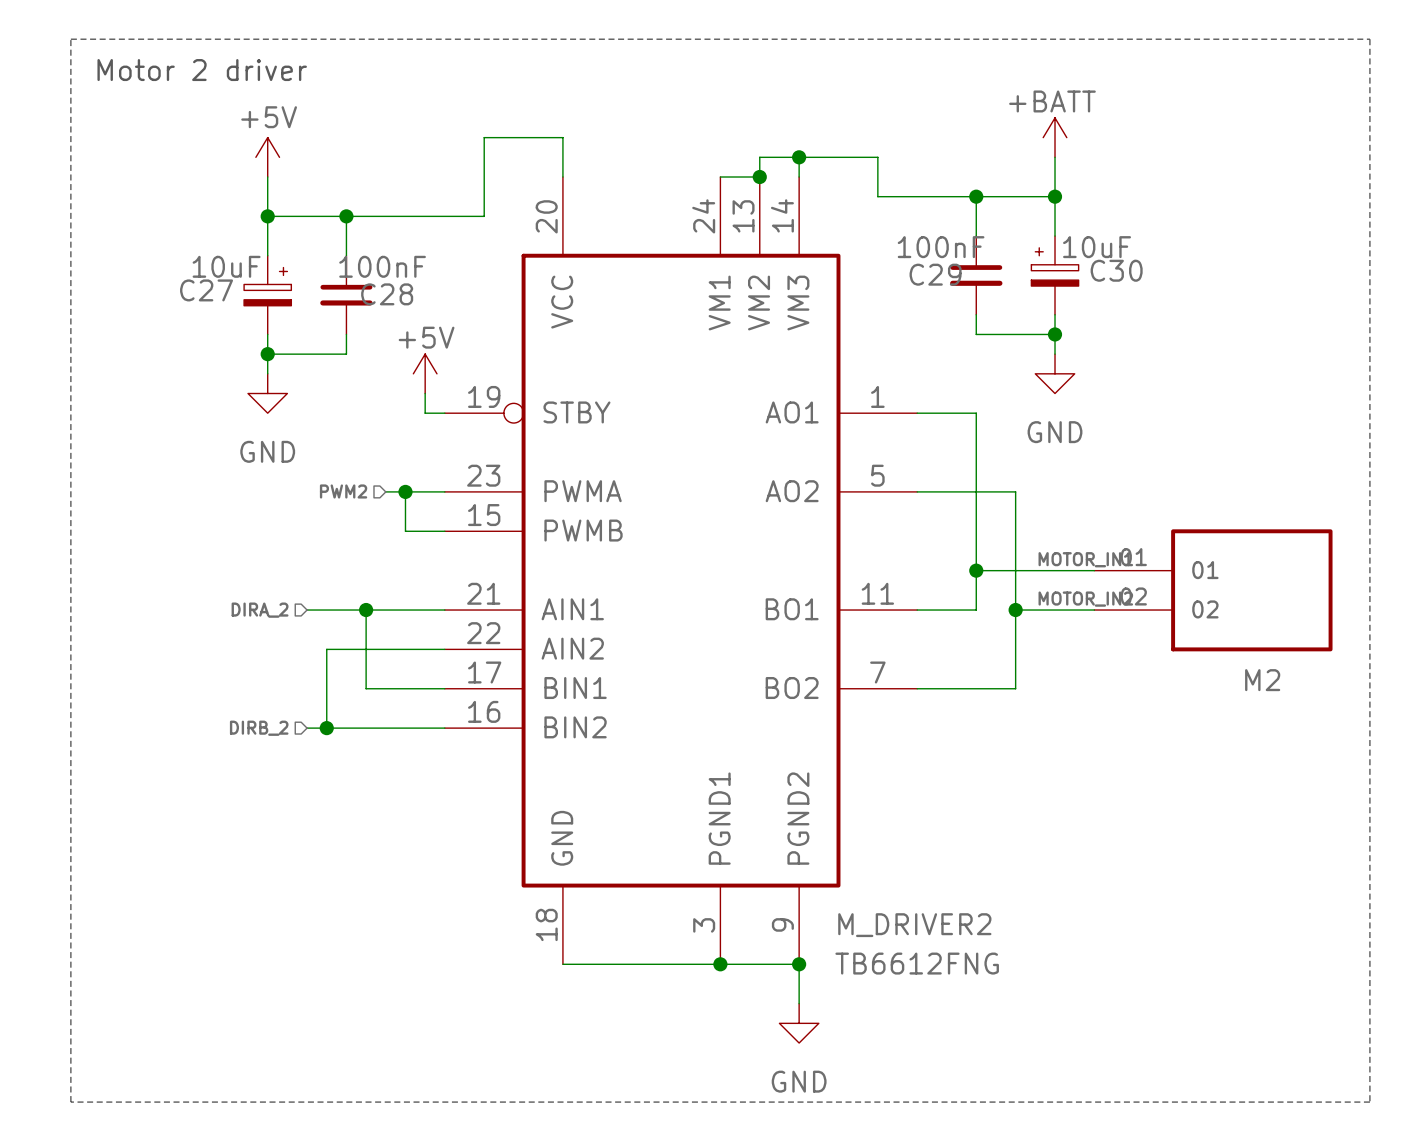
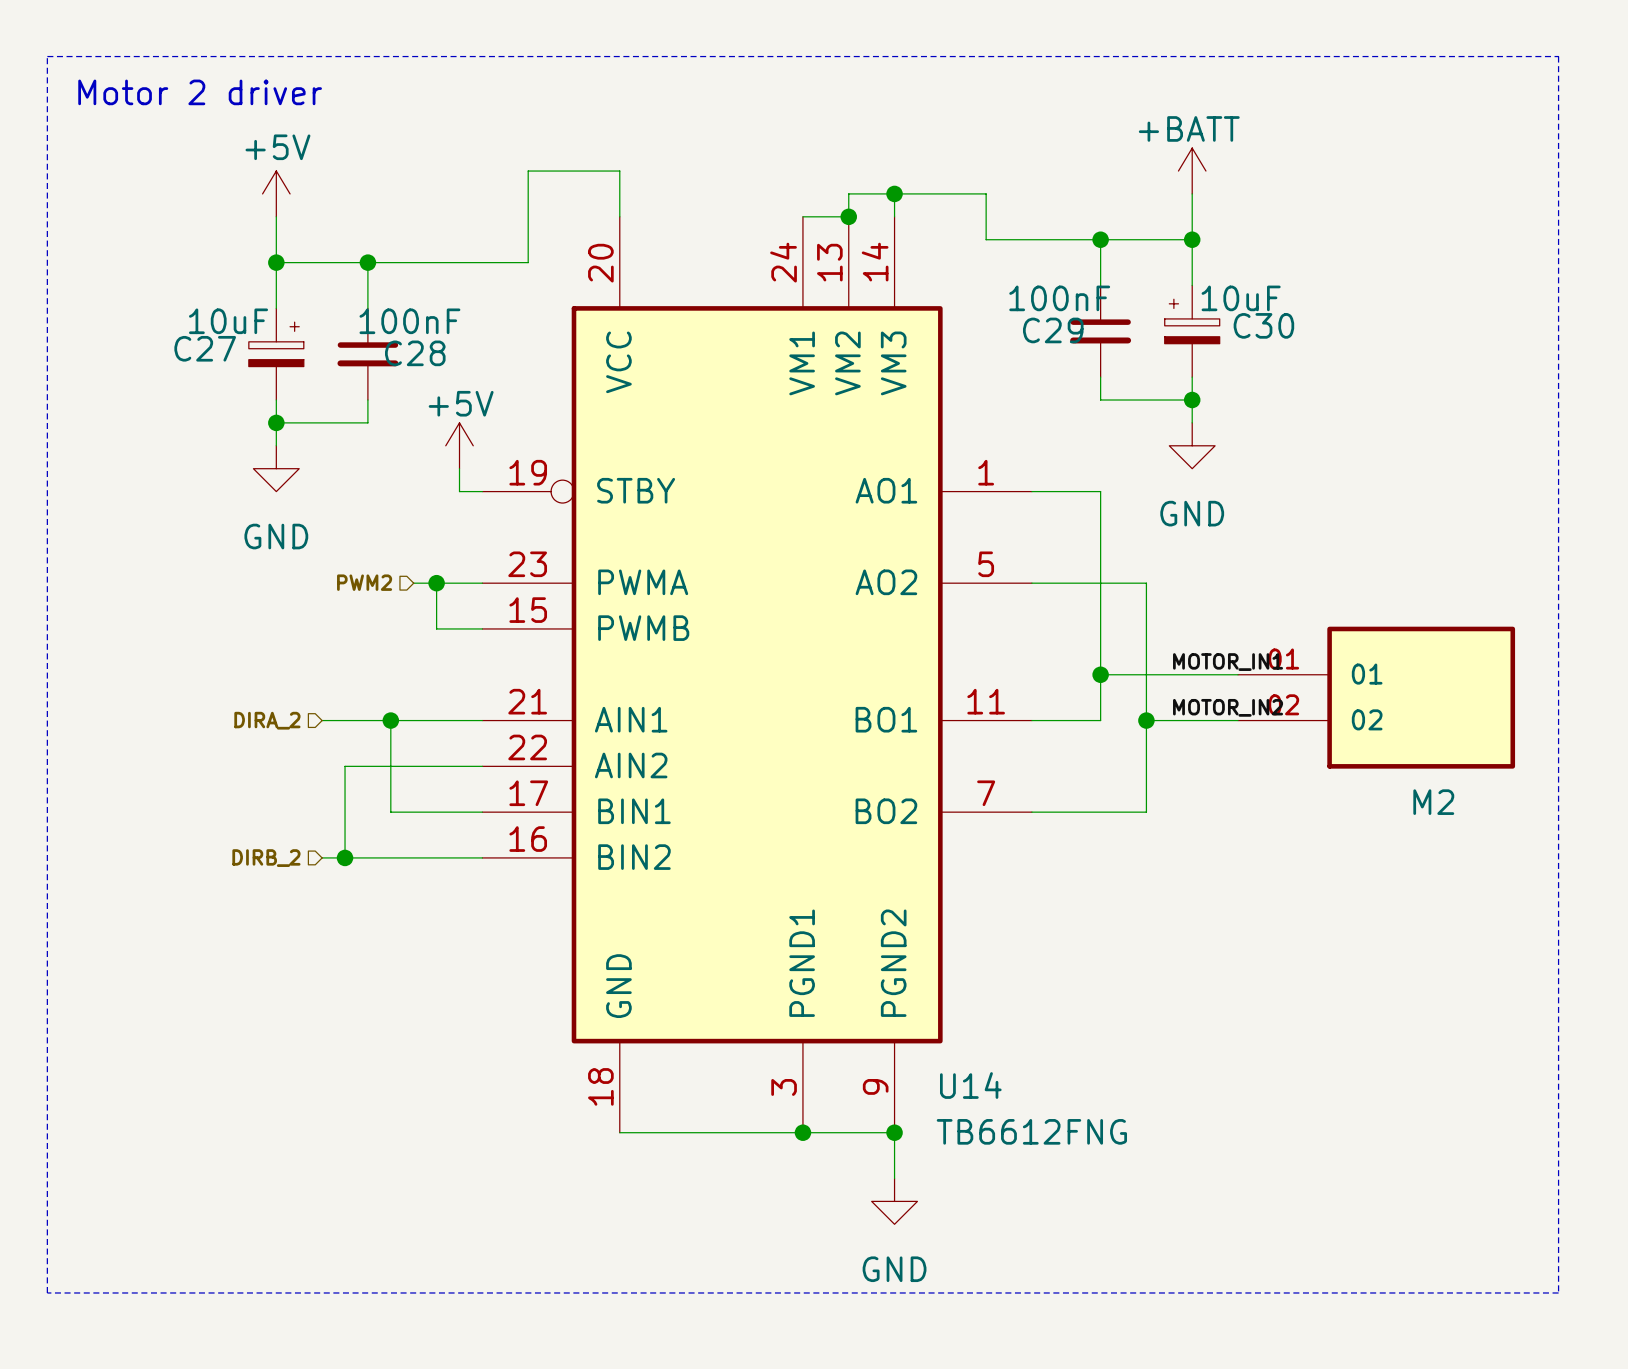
M_DRIVER2 name: M_DRIVER2 (914, 925) -> U14 (970, 1085)

